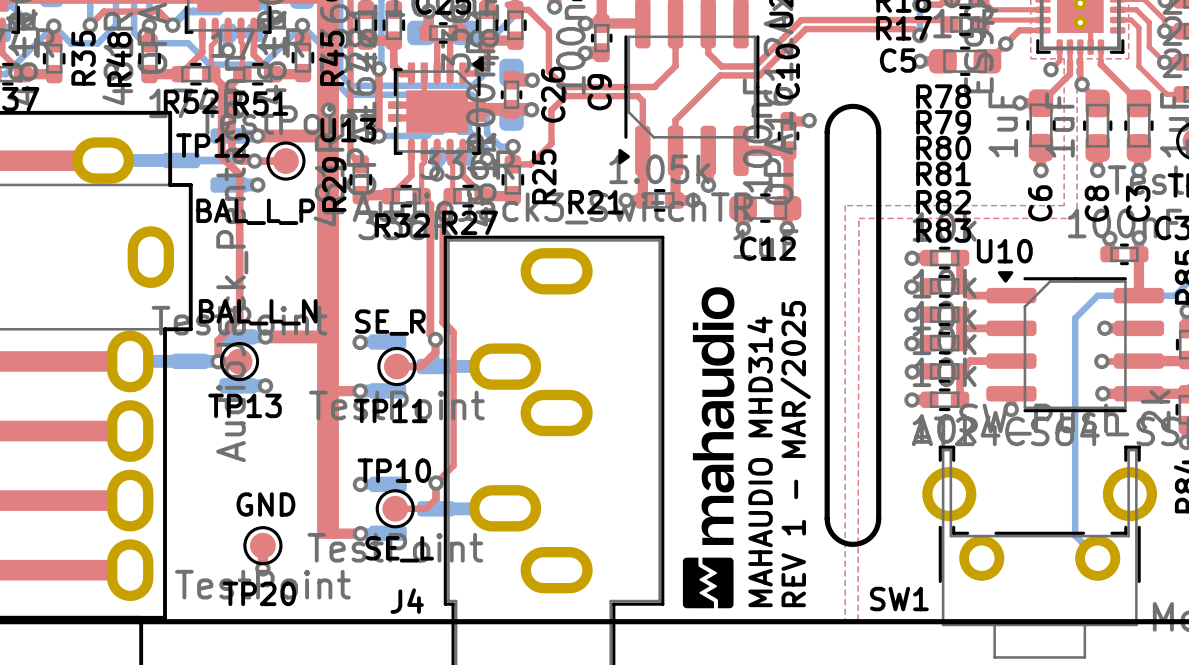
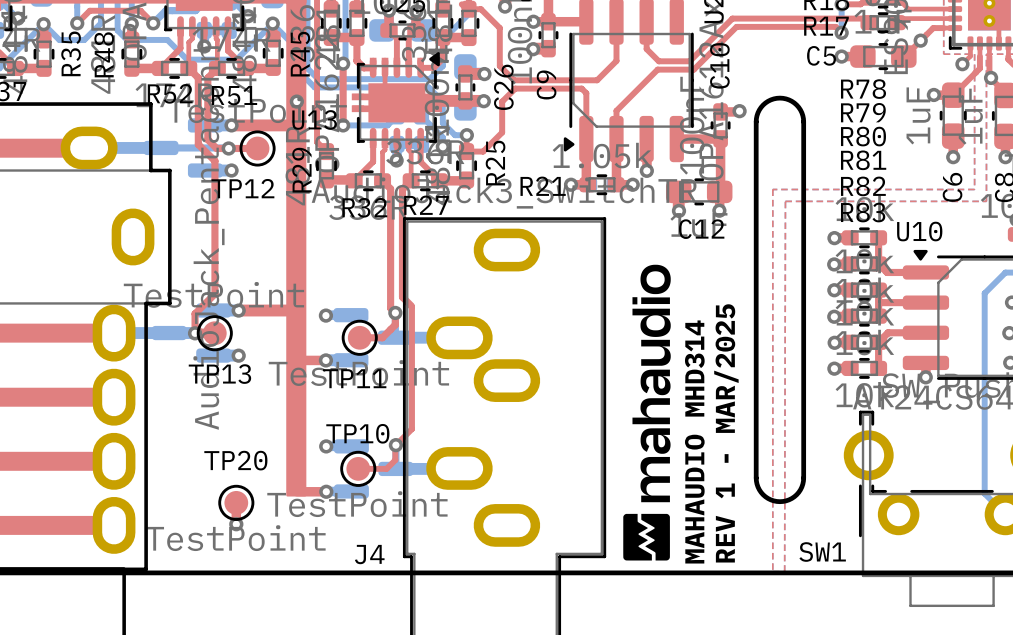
TP12 name position: TP12 (212, 145) -> TP12 (242, 188)
text: BAL_L_P (255, 211) -> none
text: BAL_L_N (258, 312) -> none
text: SE_R (390, 322) -> none
text: GND (265, 504) -> none
text: SE_L (399, 549) -> none
TP20 name position: TP20 (259, 593) -> TP20 (235, 460)

